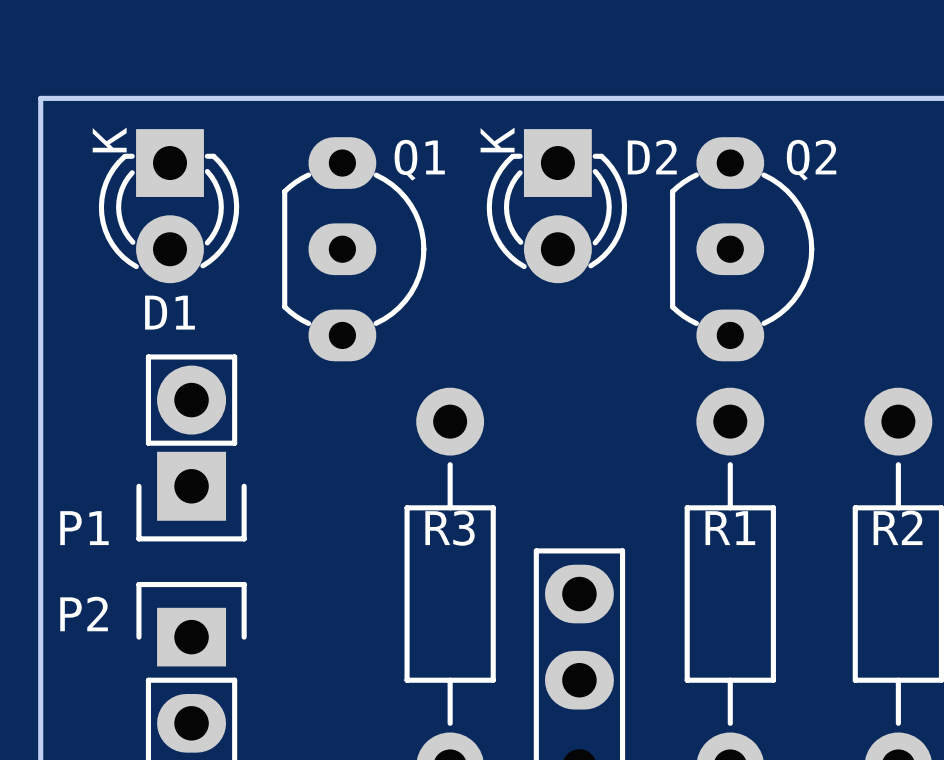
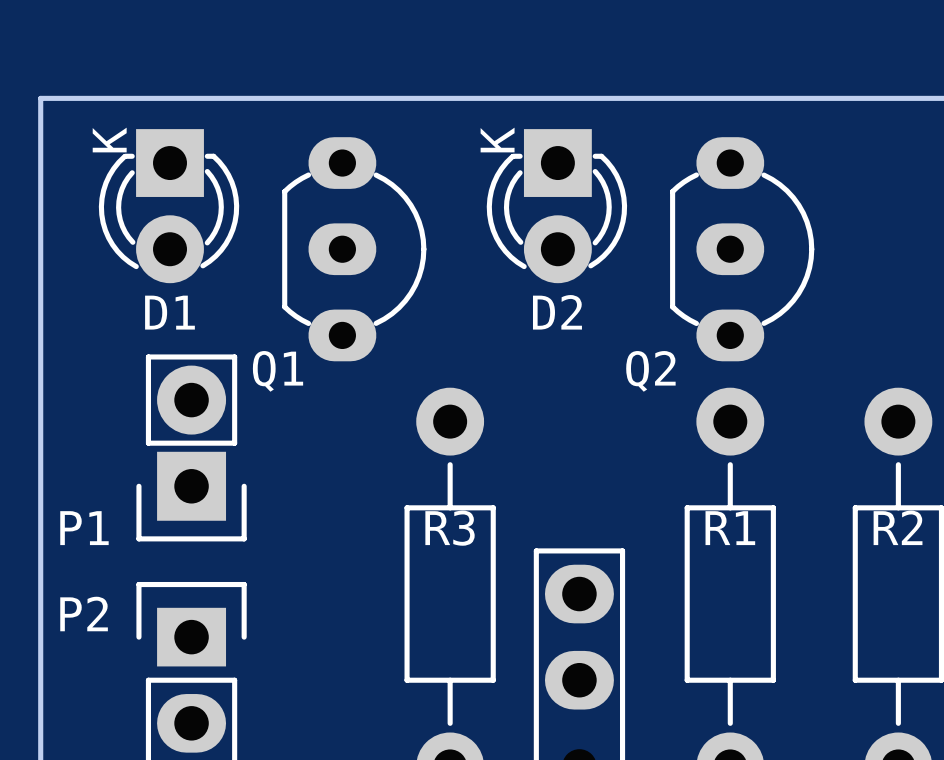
D2 name position: D2 (652, 157) -> D2 (557, 312)
Q1 name position: Q1 (419, 160) -> Q1 (278, 371)
Q2 name position: Q2 (811, 160) -> Q2 (650, 371)

